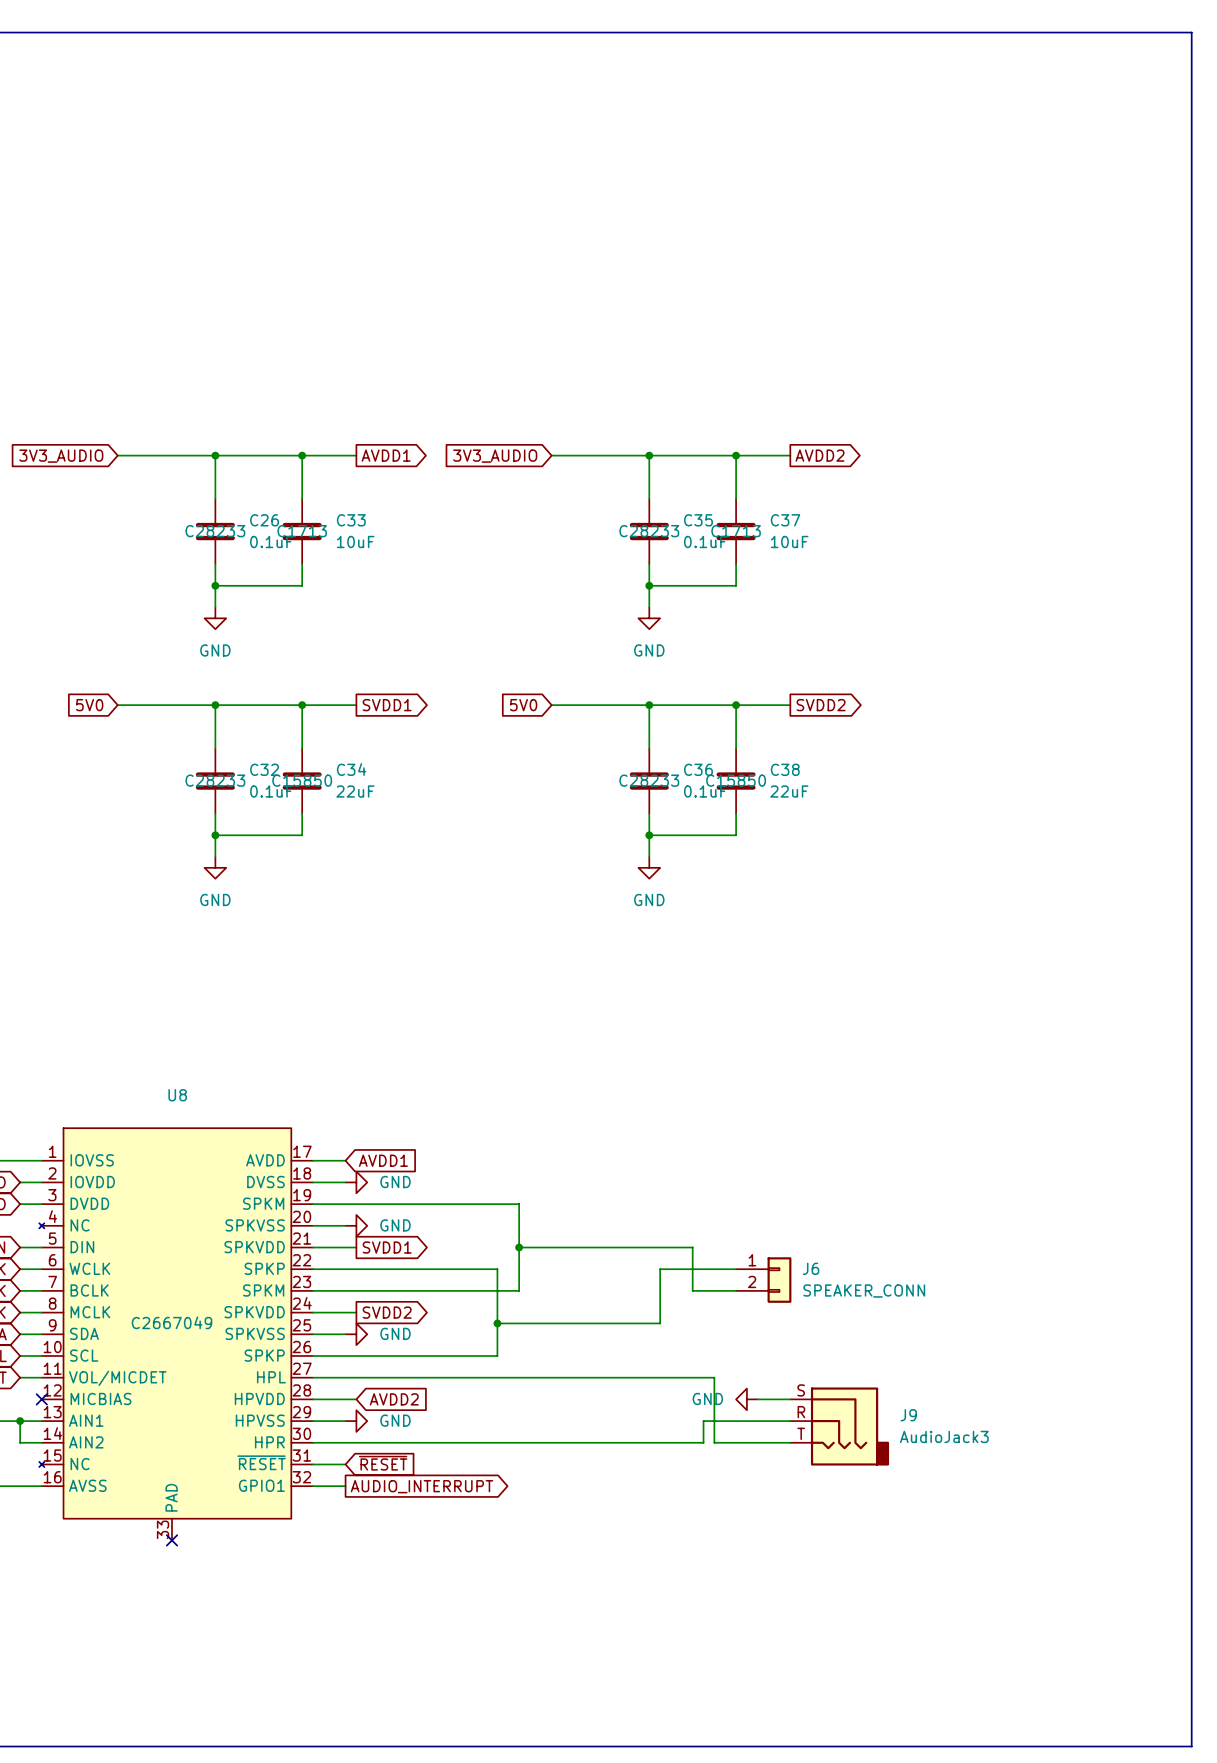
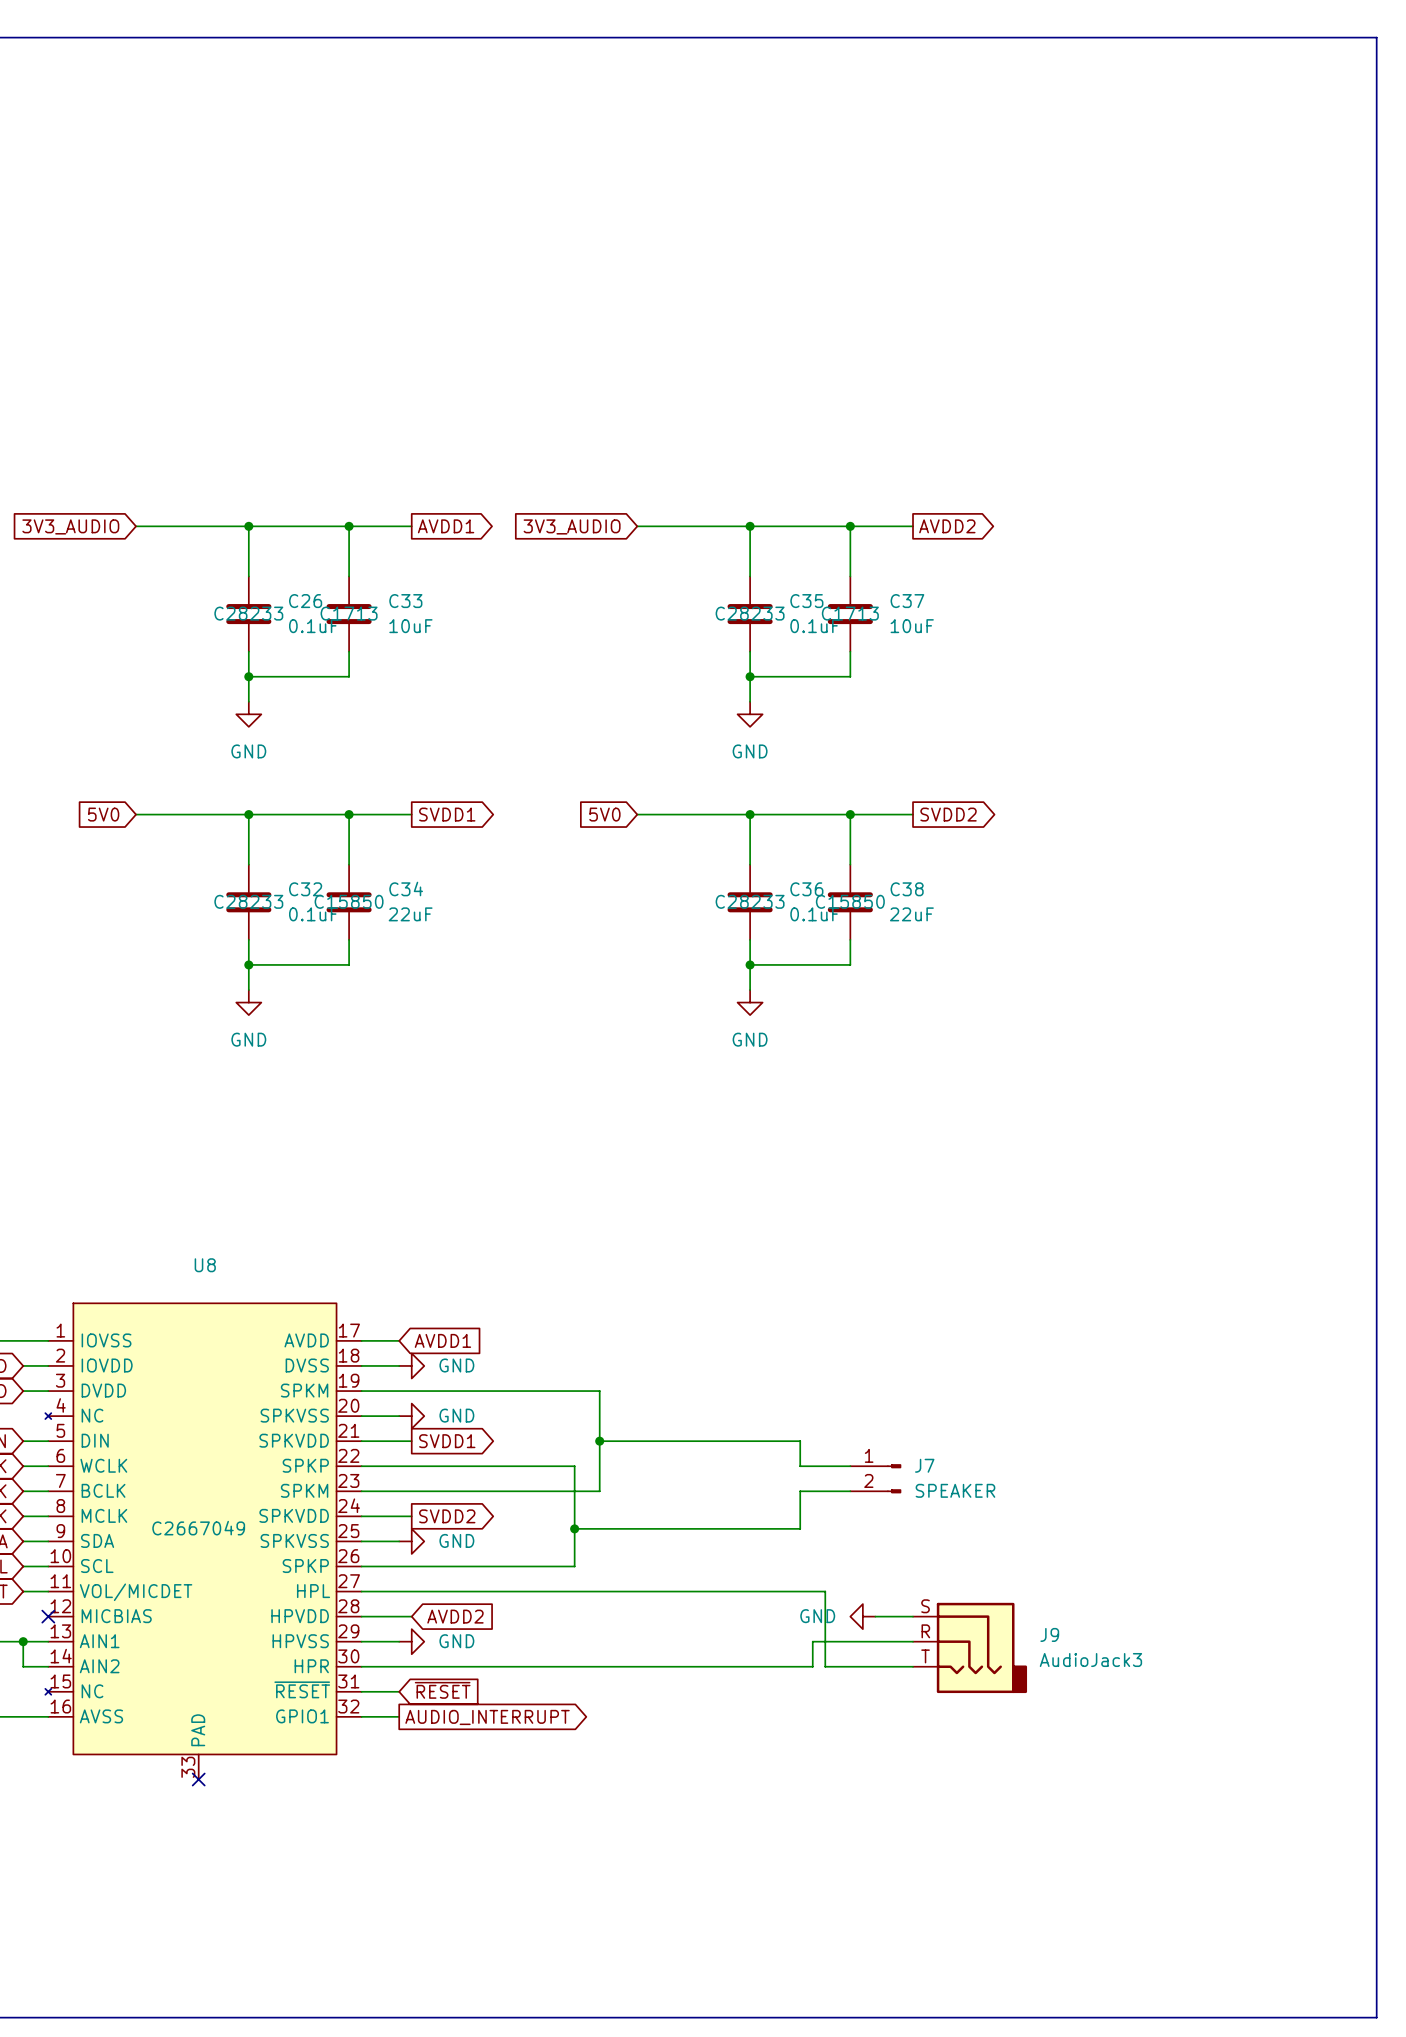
J7: none -> SPEAKER (875, 1478)
J6: SPEAKER_CONN (763, 1280) -> none
wire: (692, 1290) (692, 1269) (660, 1269) (660, 1323) -> (800, 1491) (800, 1528) (762, 1528)

